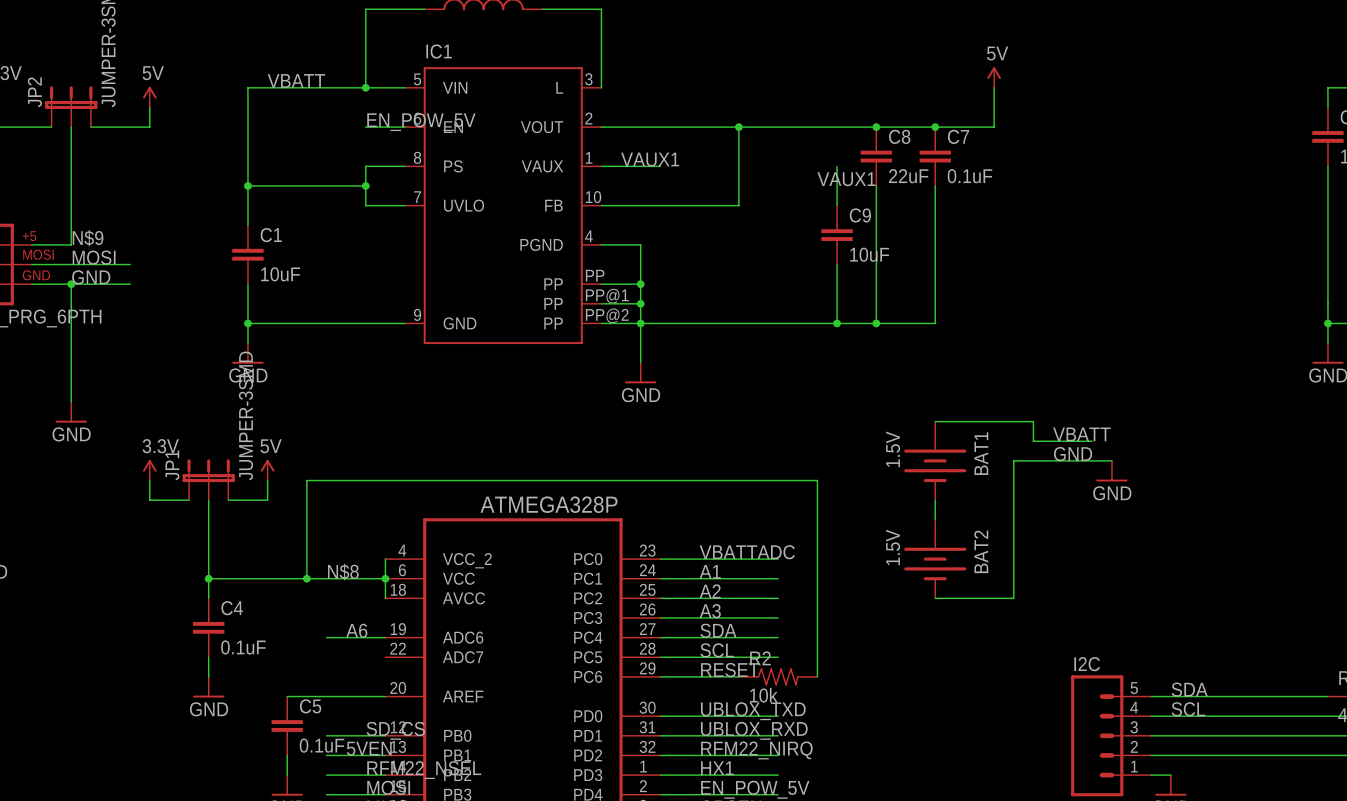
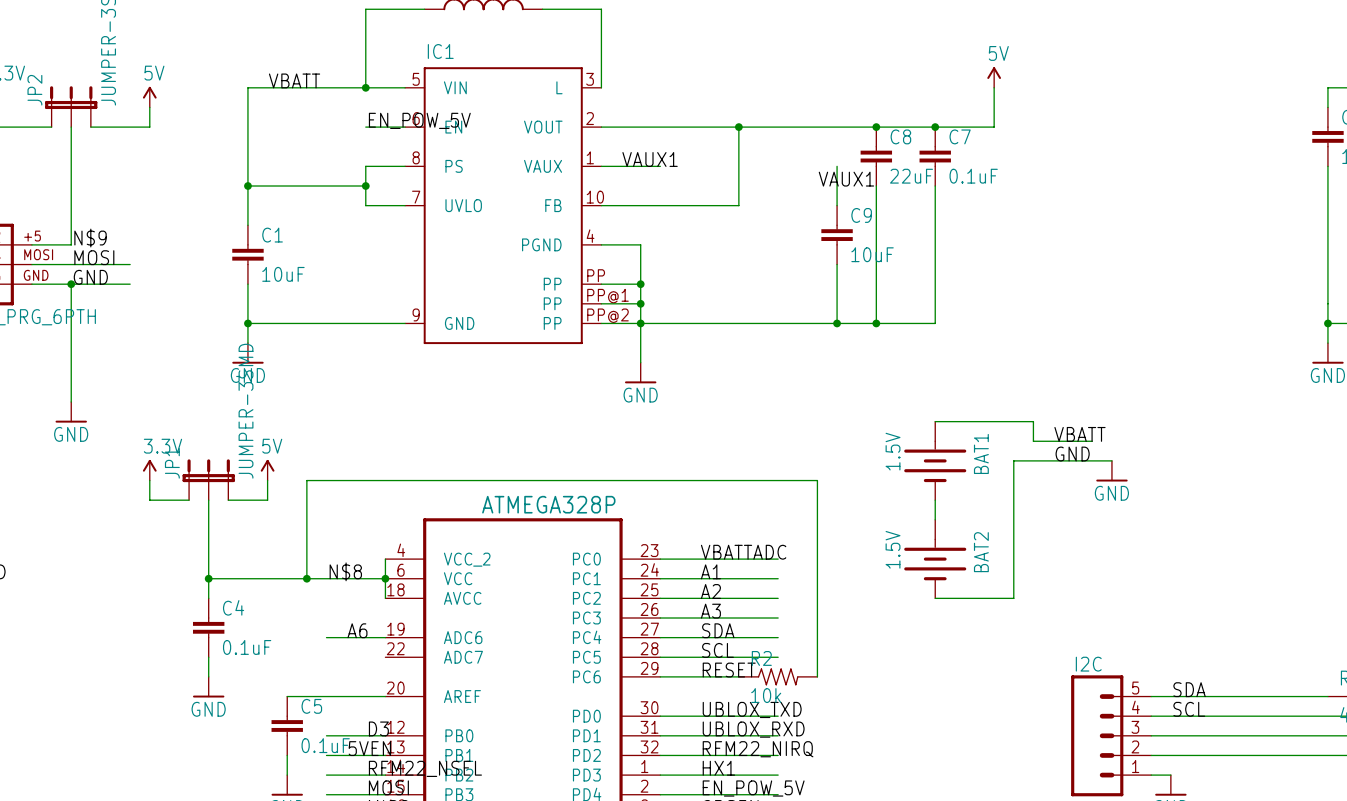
label: SD_CS (395, 730) -> D3 (378, 728)

